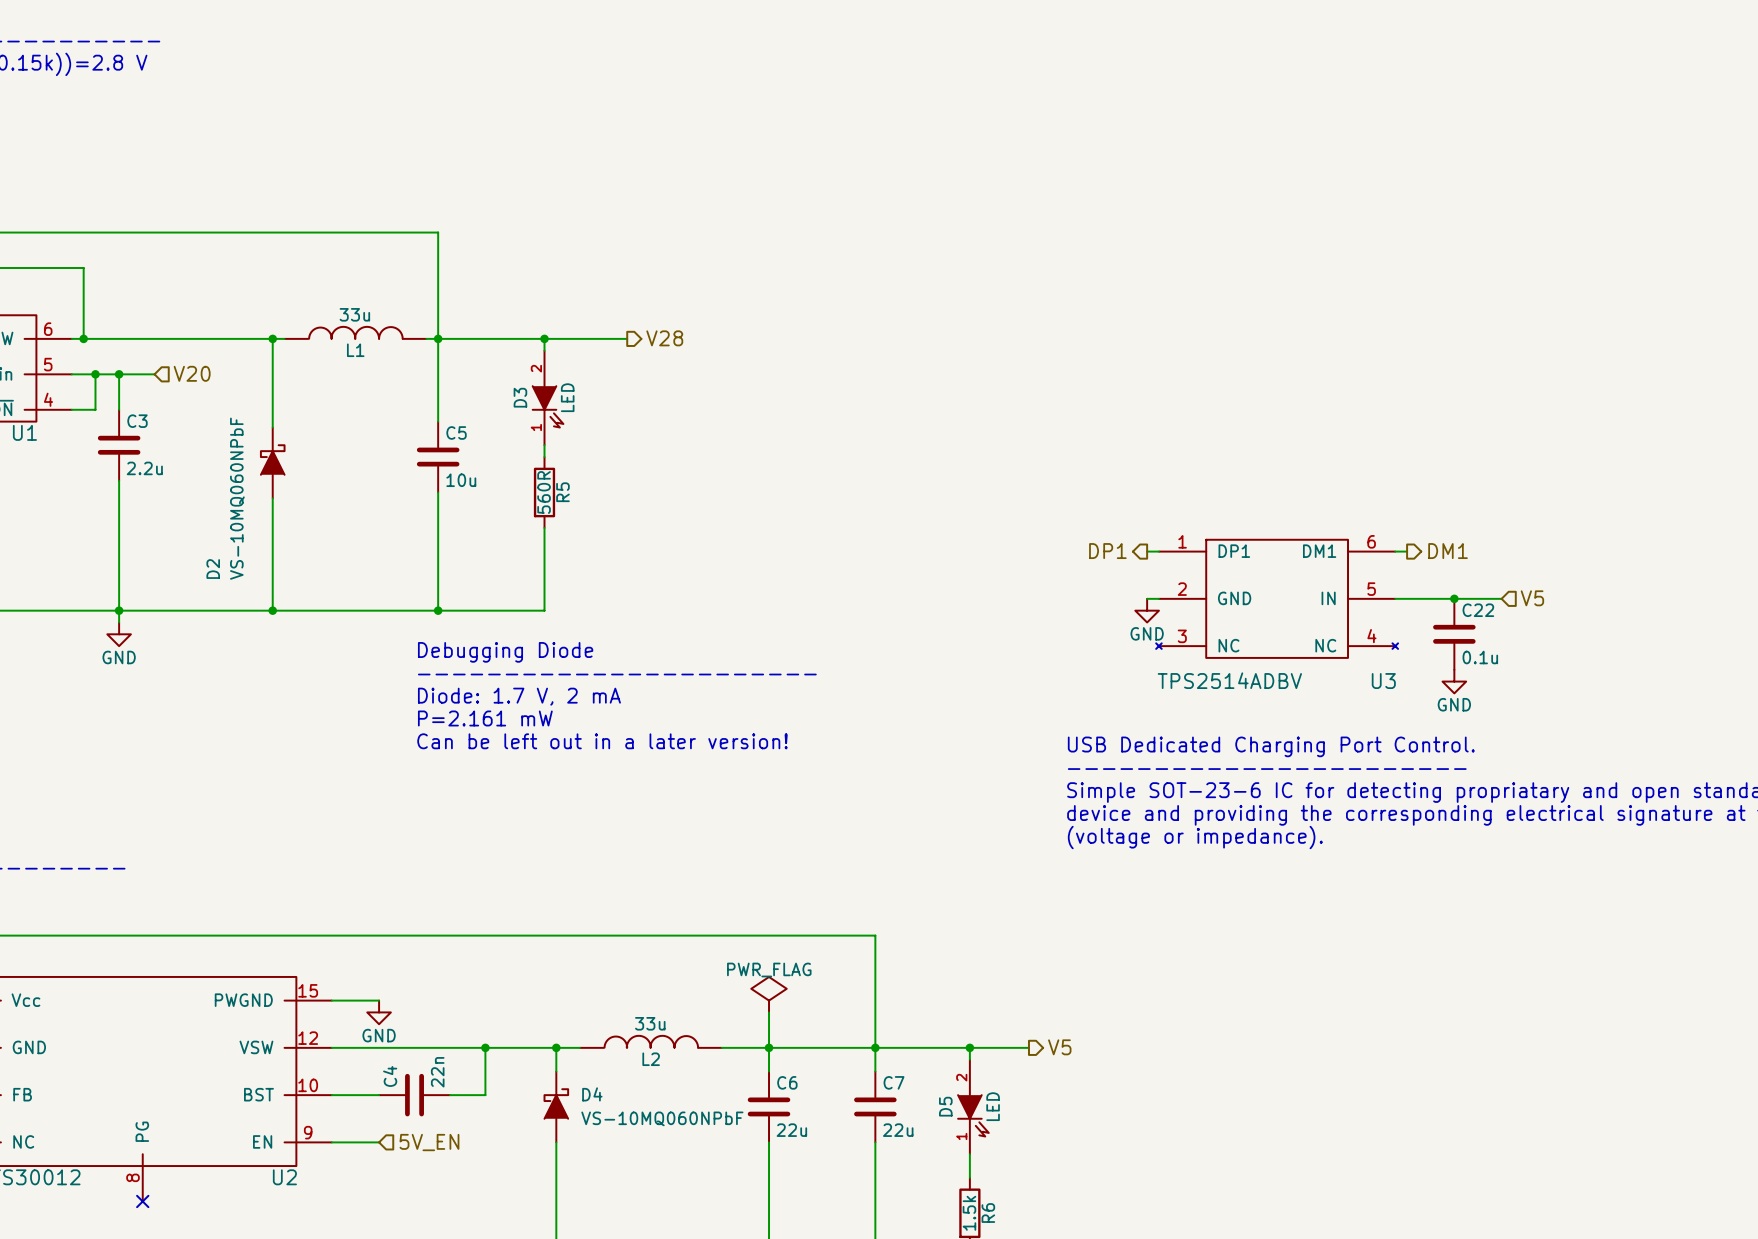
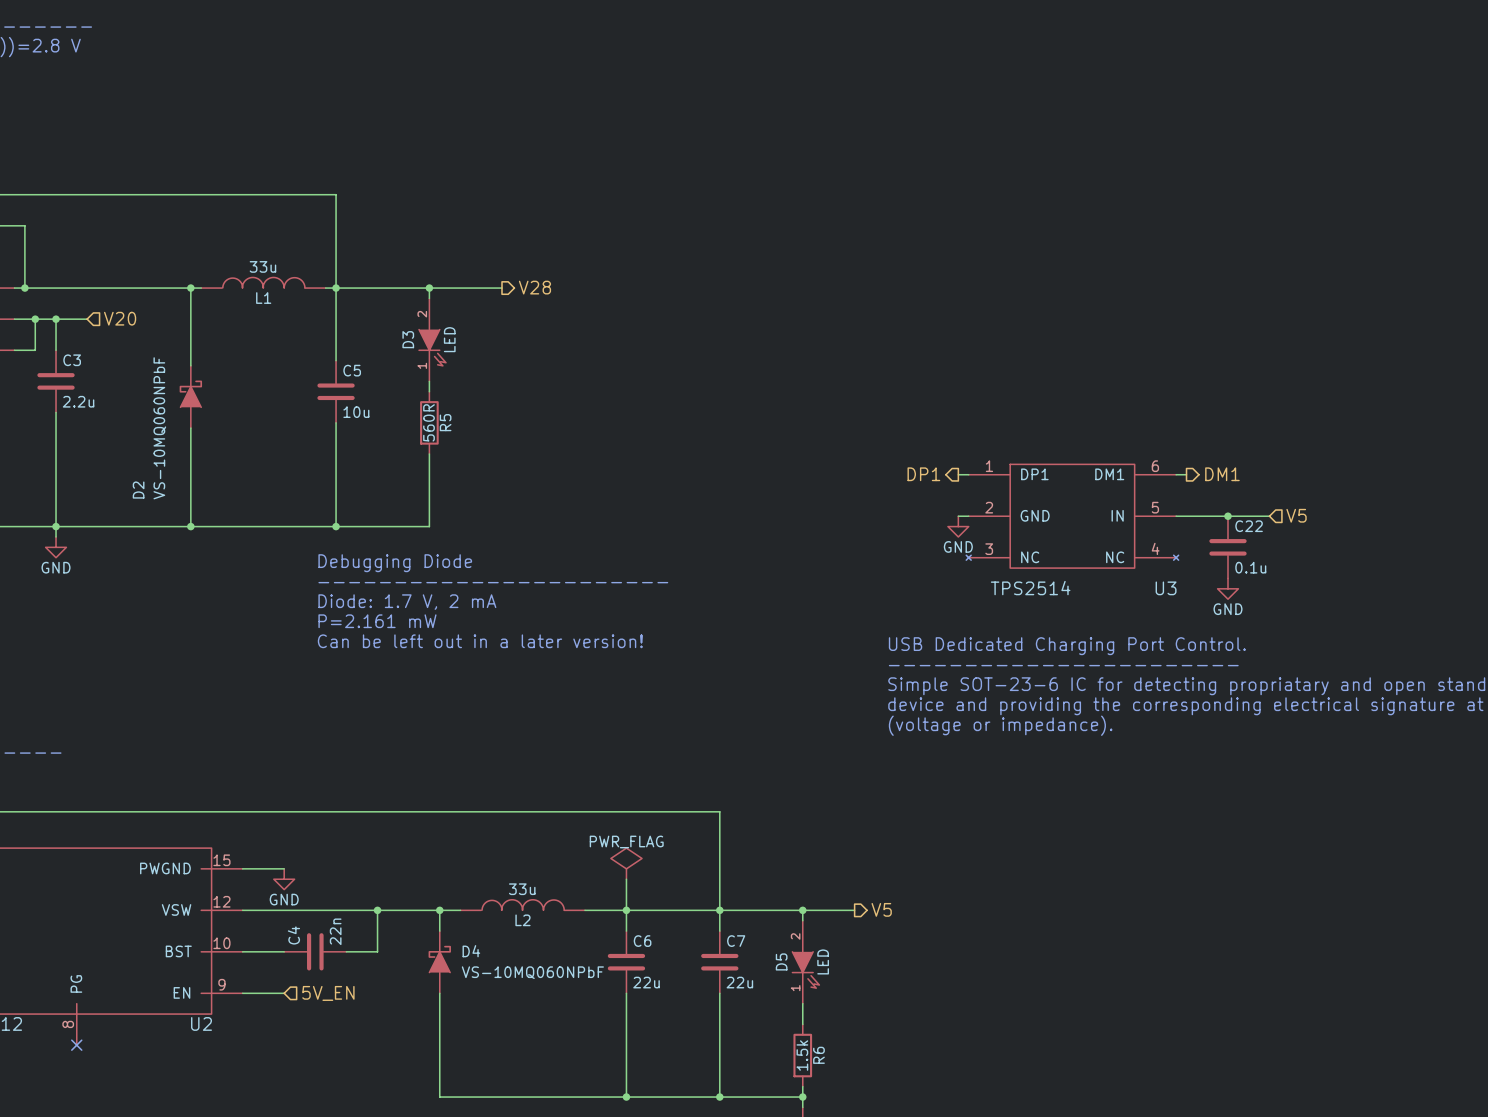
U3 value: TPS2514ADBV (1229, 680) -> TPS2514 (1030, 588)

